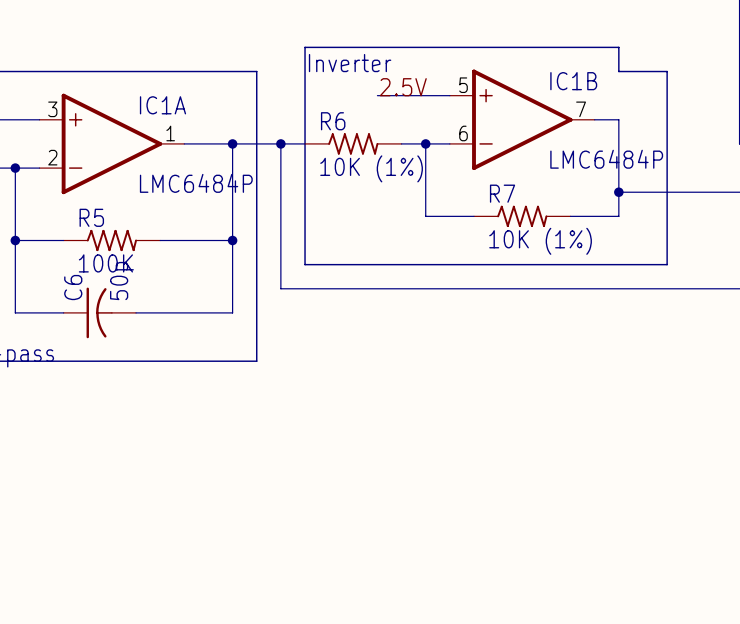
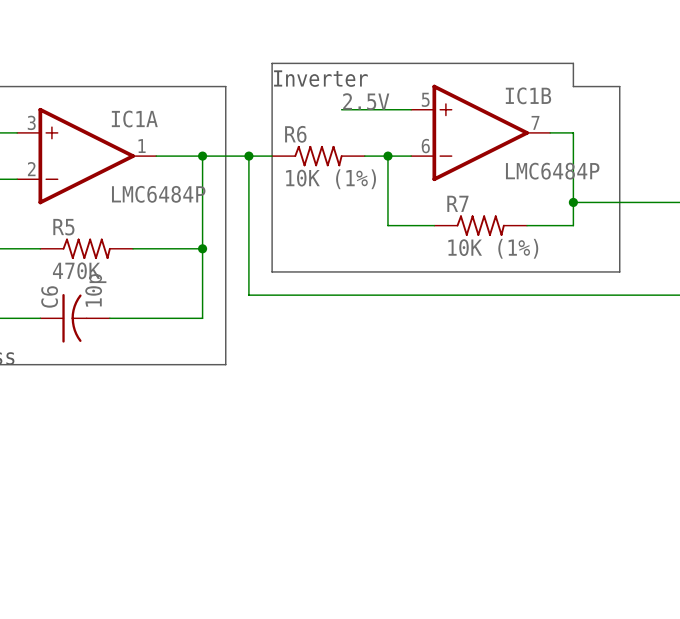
R5 value: 100K (105, 263) -> 470K (76, 270)
C6 value: 50p (121, 281) -> 10p (95, 290)

